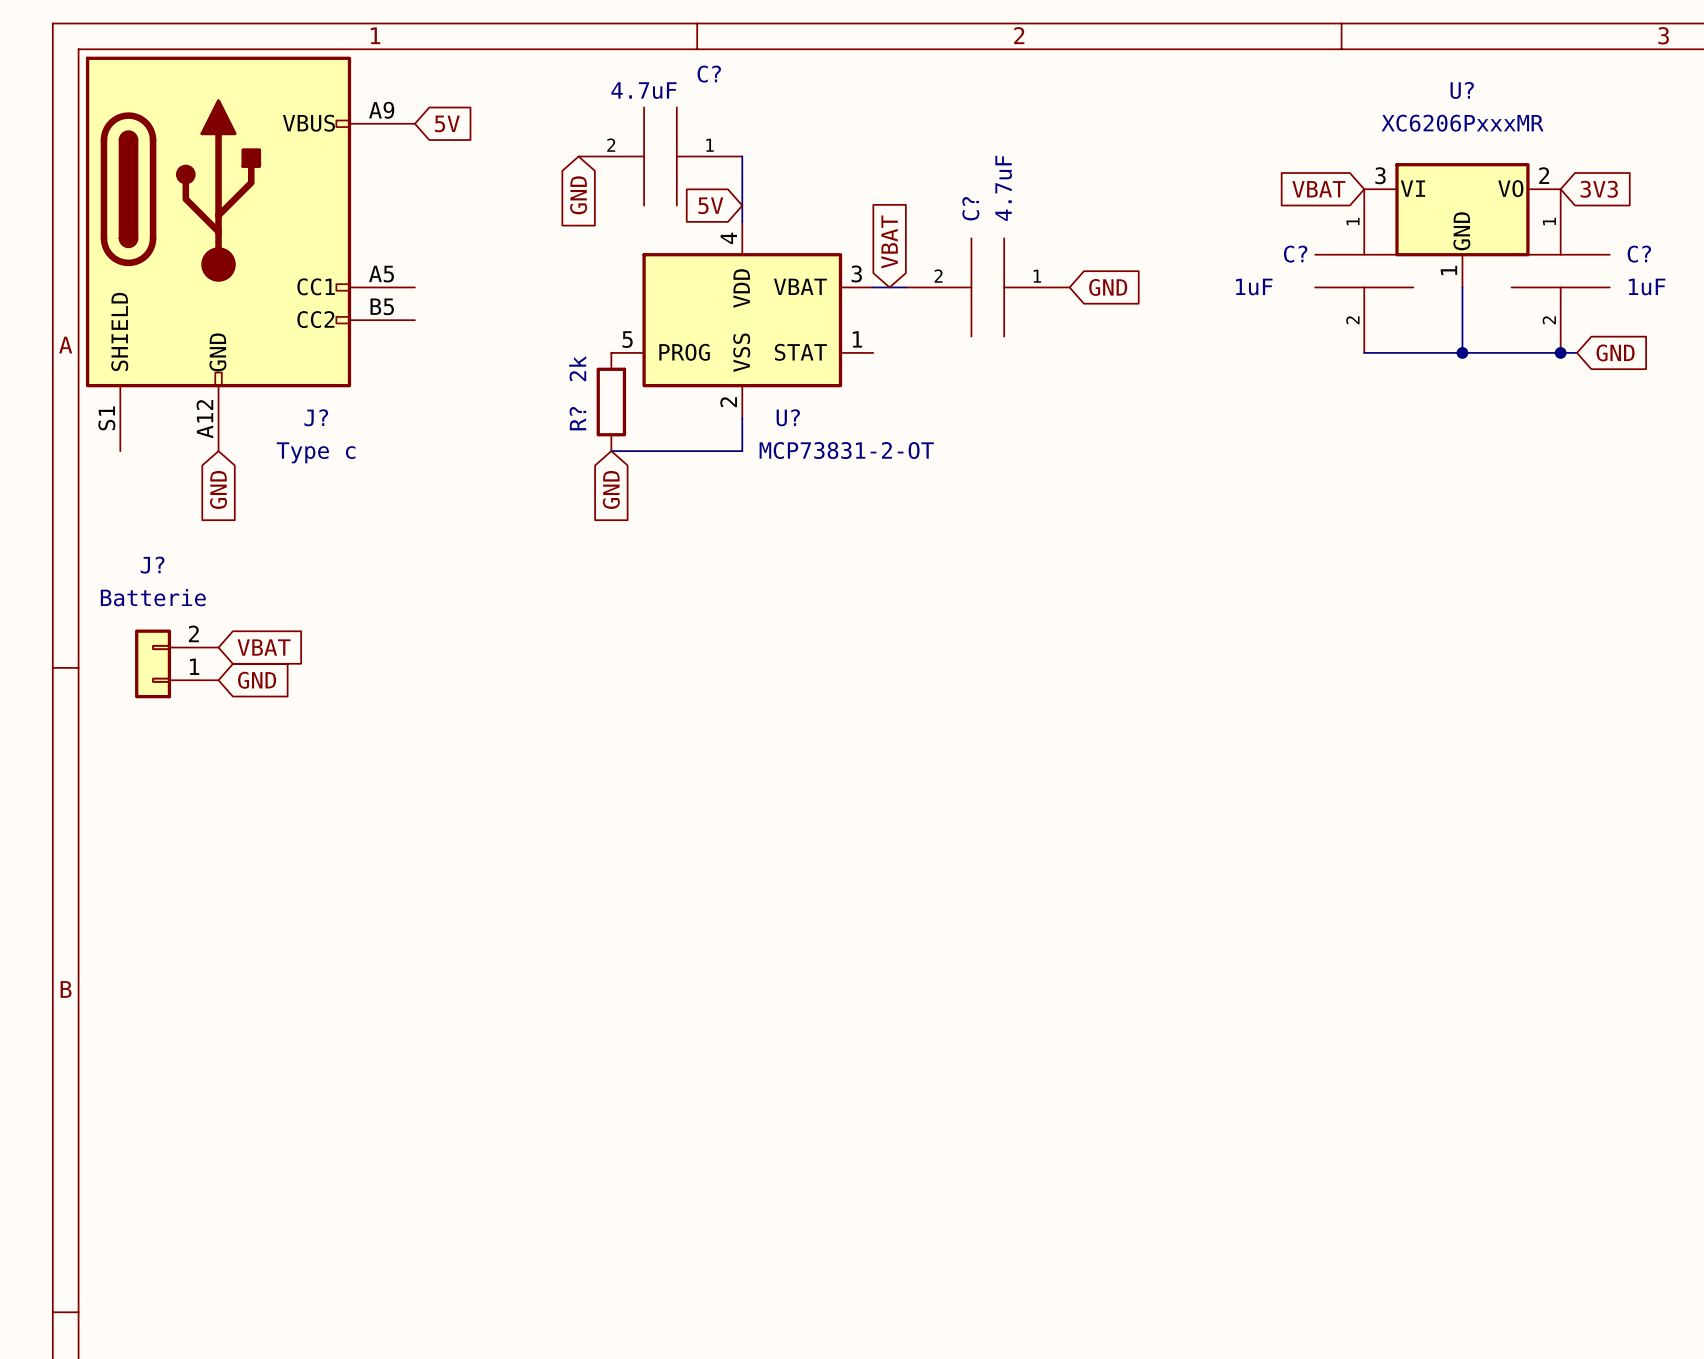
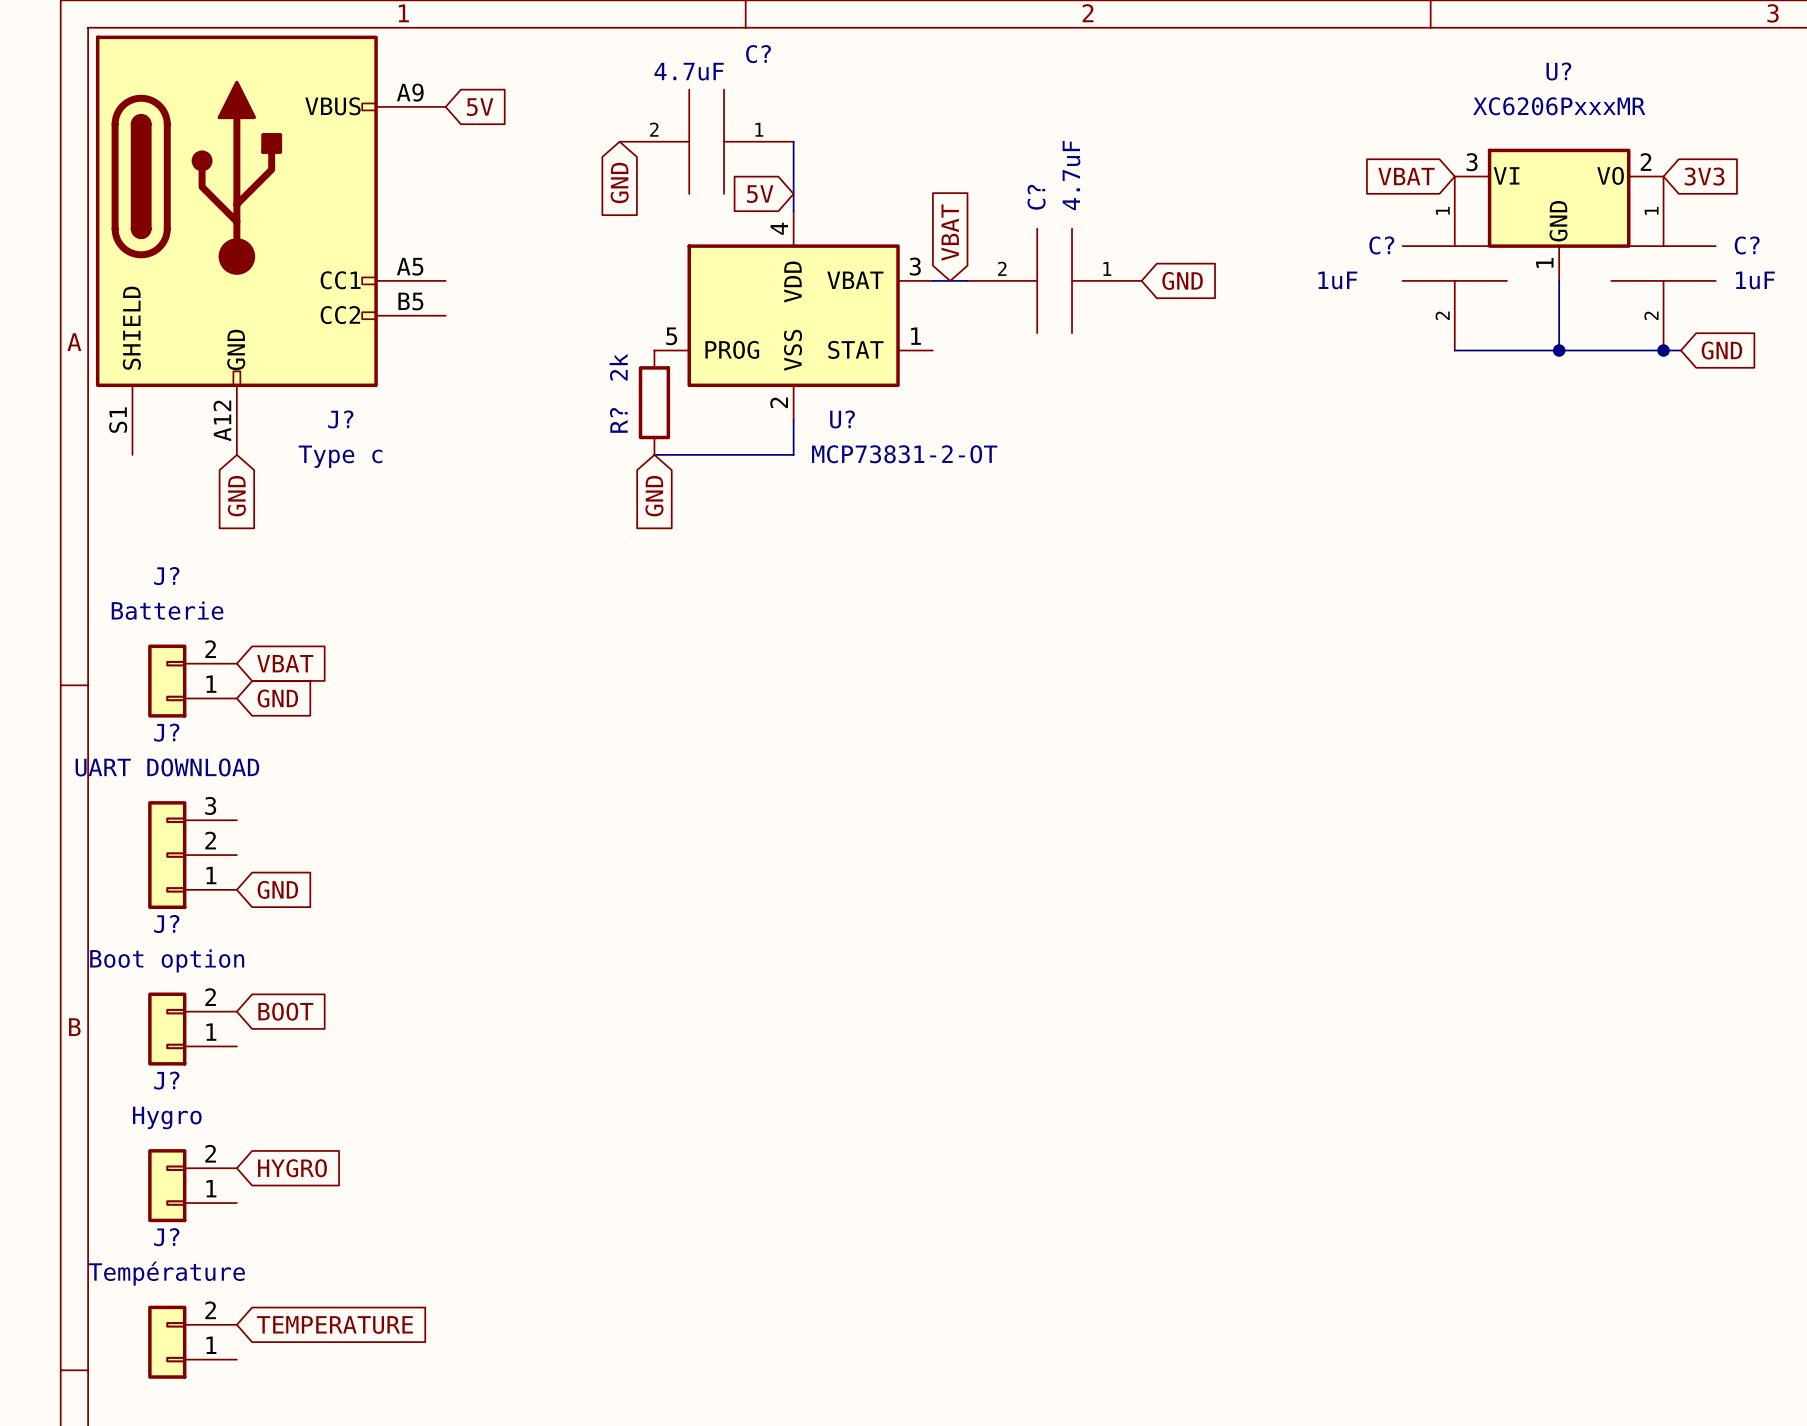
J?: none -> UART DOWNLOAD (192, 855)
global label: none -> GND (277, 889)
global label: none -> BOOT (285, 1011)
J?: none -> Boot option (192, 1029)
global label: none -> HYGRO (292, 1168)
J?: none -> Hygro (192, 1185)
global label: none -> TEMPERATURE (334, 1324)
J?: none -> Température (192, 1342)

